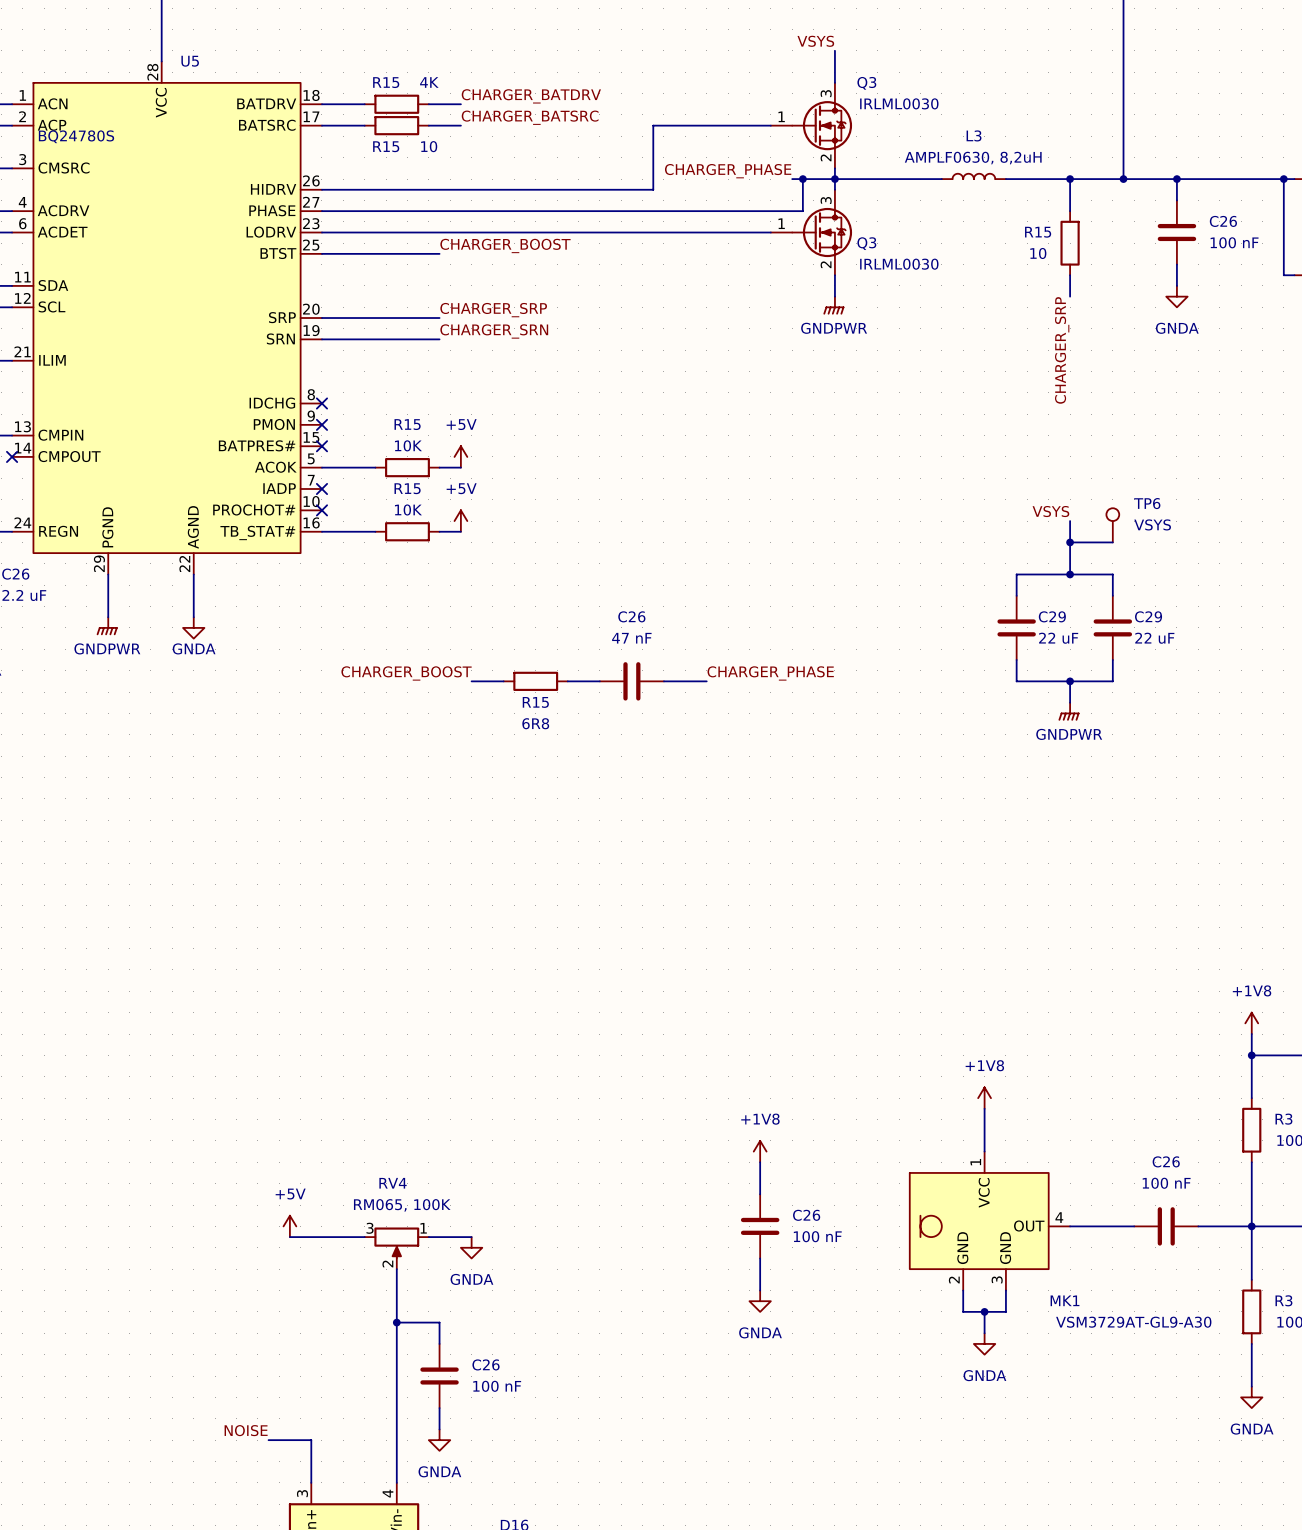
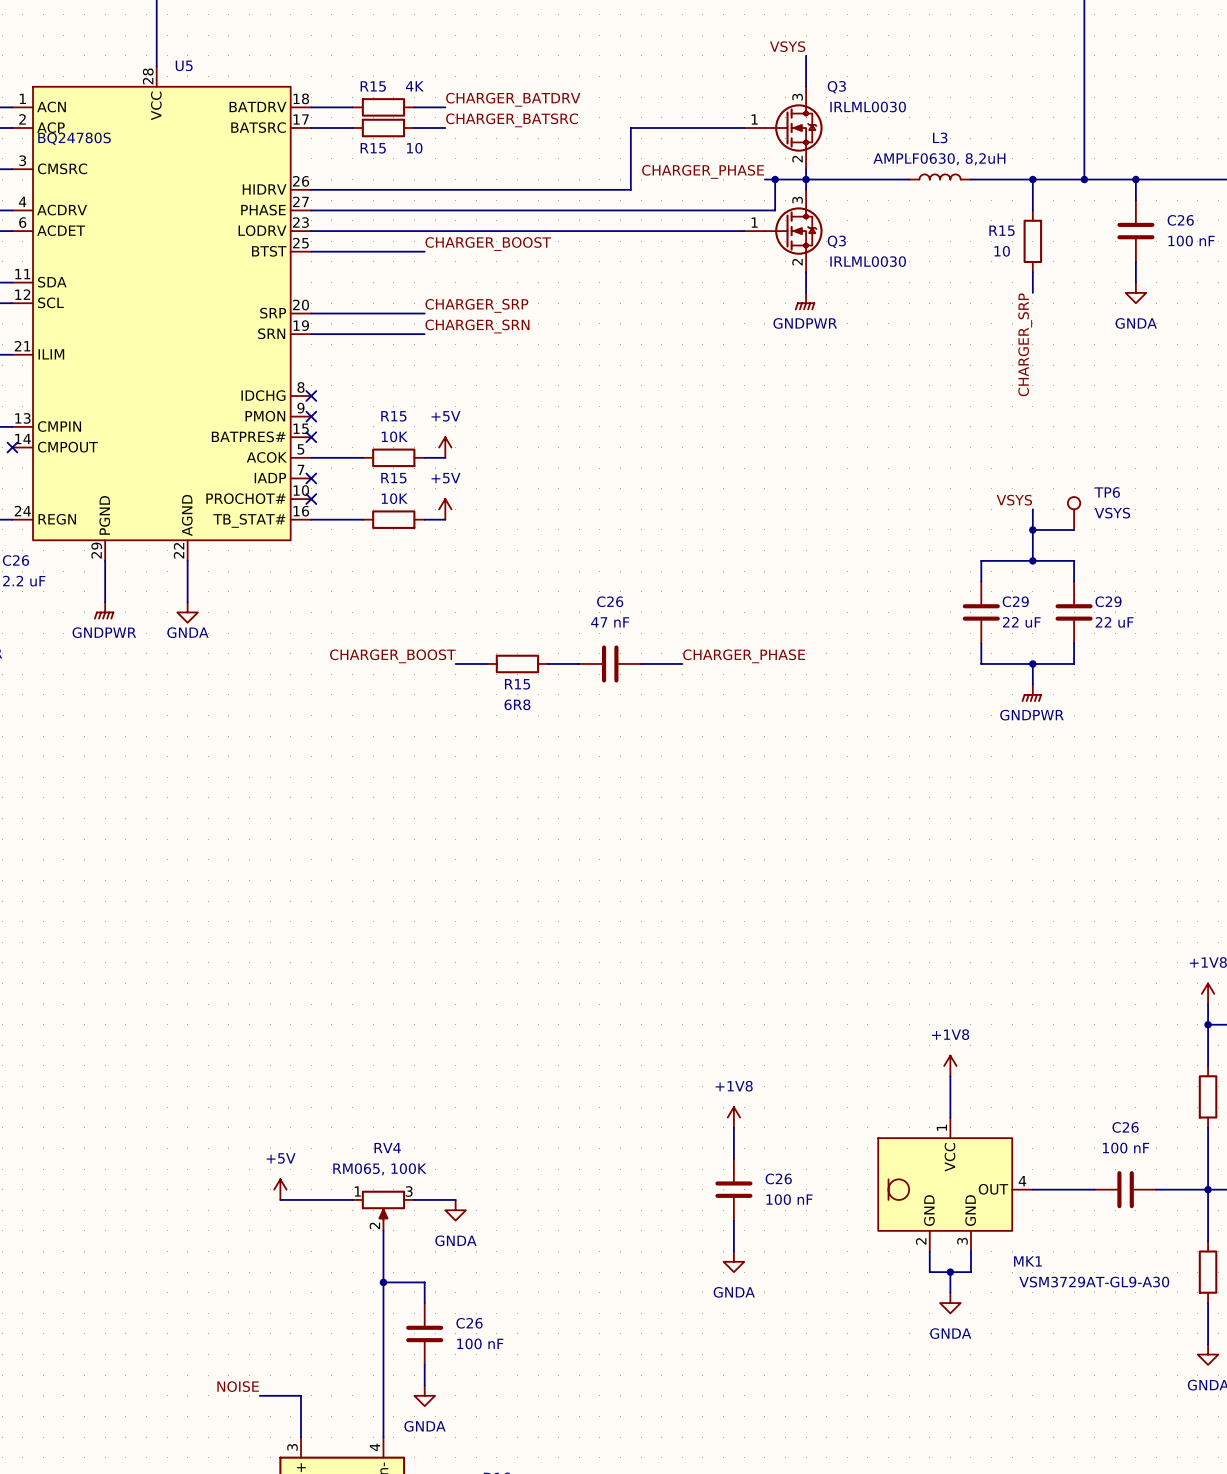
RV4 flip: as is (396, 1242) -> left-right (383, 1205)

